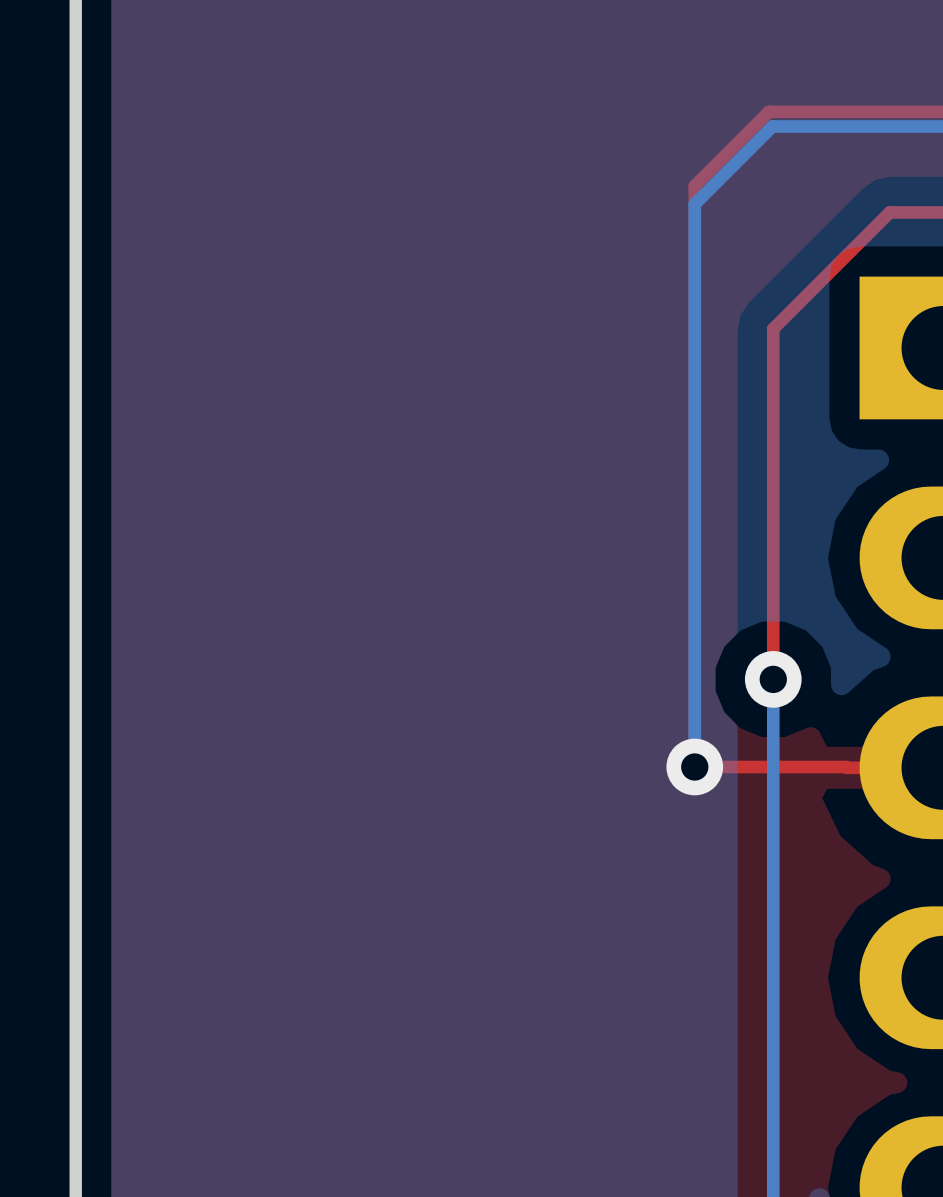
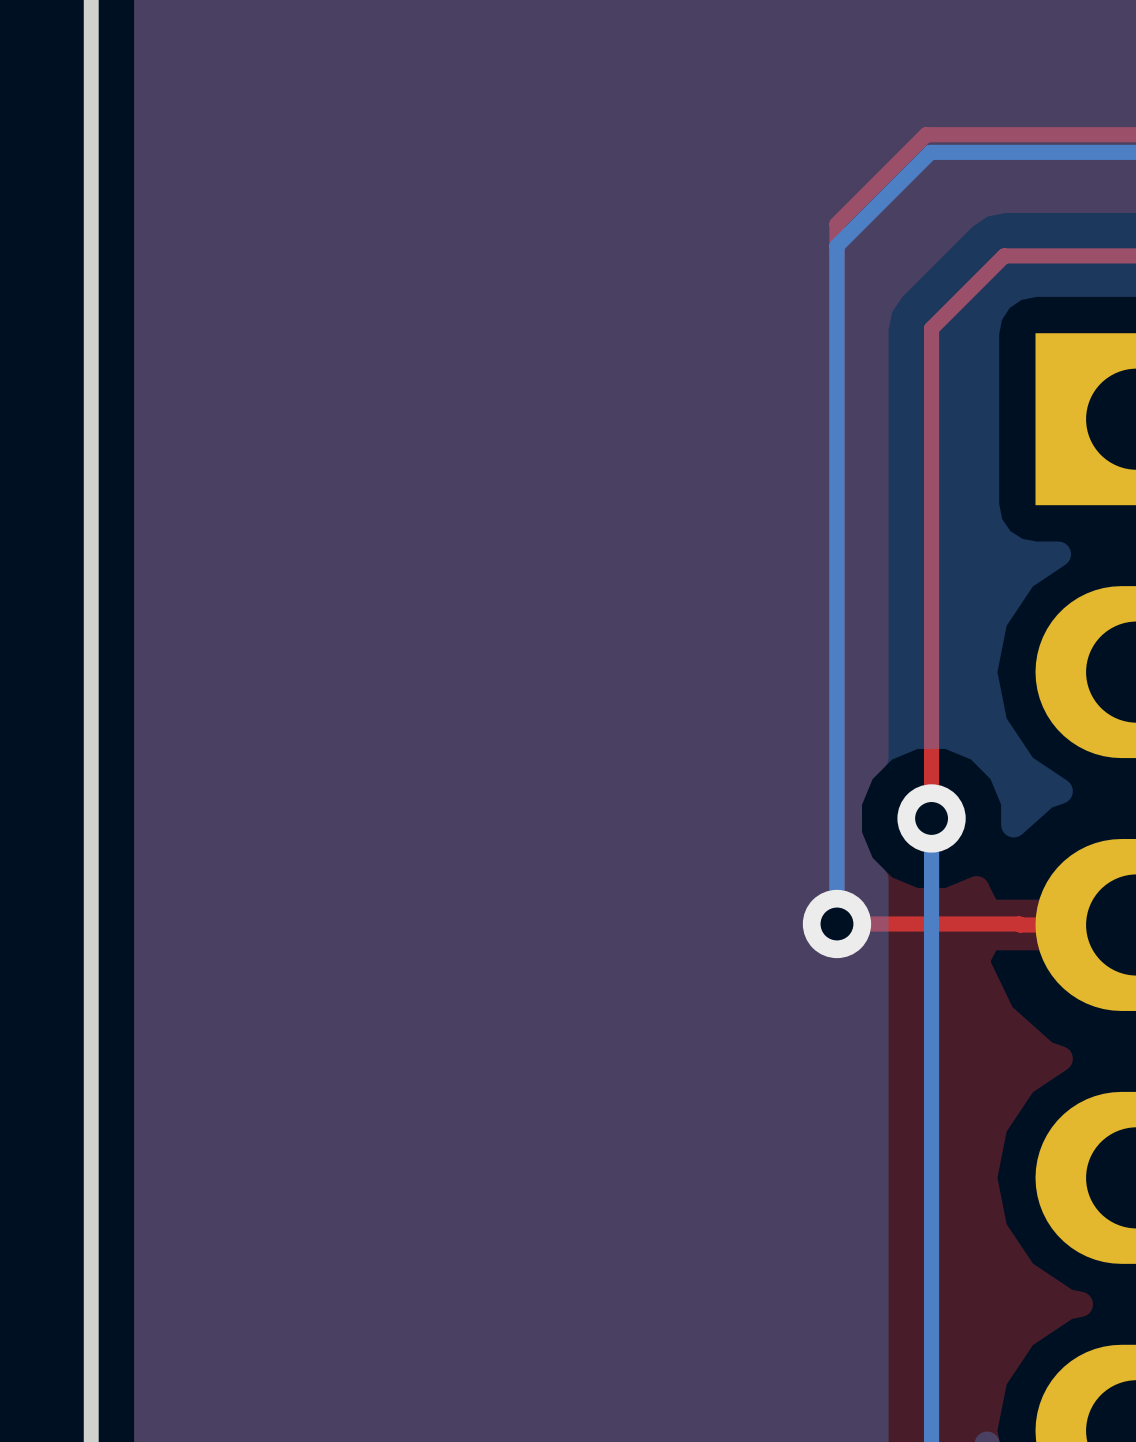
top track: (889, 212) (773, 328) -> (1071, 255) (1004, 255) (931, 328) (931, 396)

